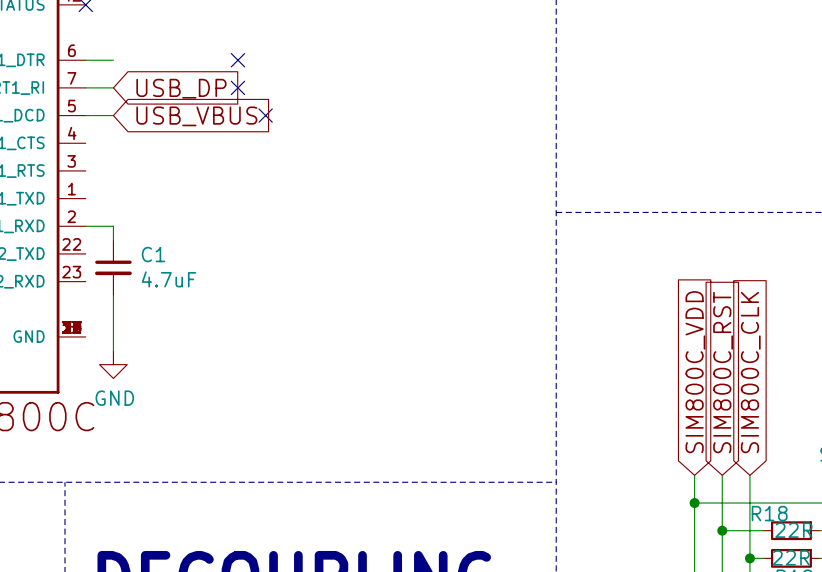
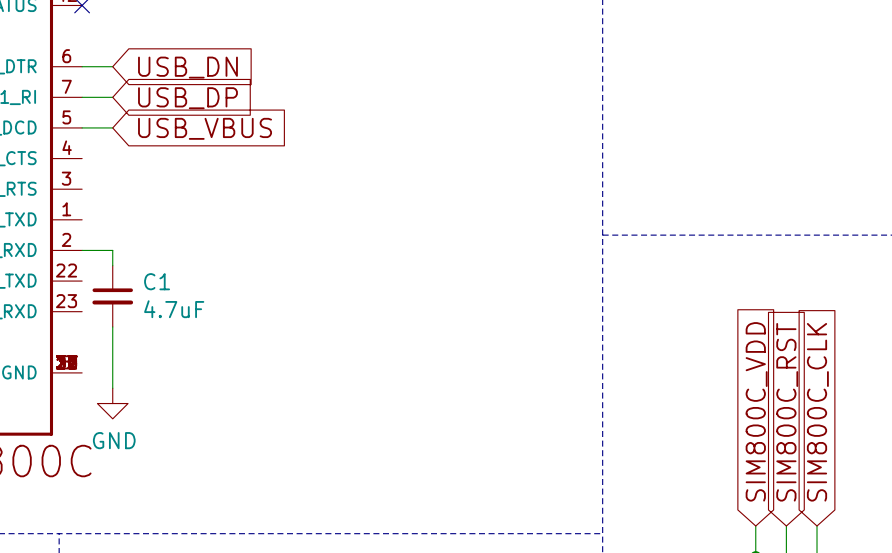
no-connect mark: (237, 60) -> none
global label: none -> USB_DN (187, 67)
no-connect mark: (237, 87) -> none
no-connect mark: (265, 115) -> none

